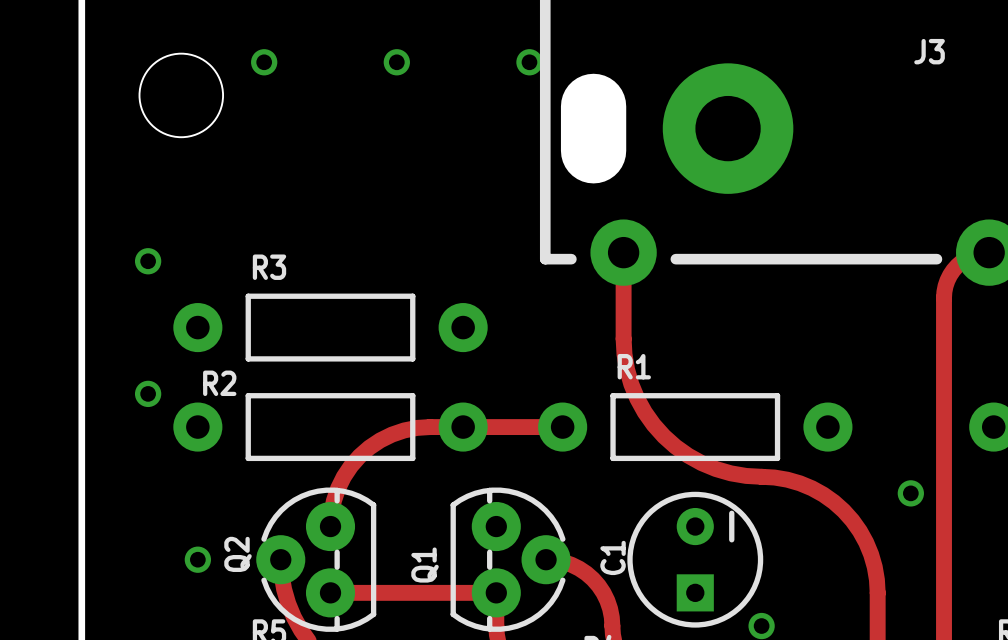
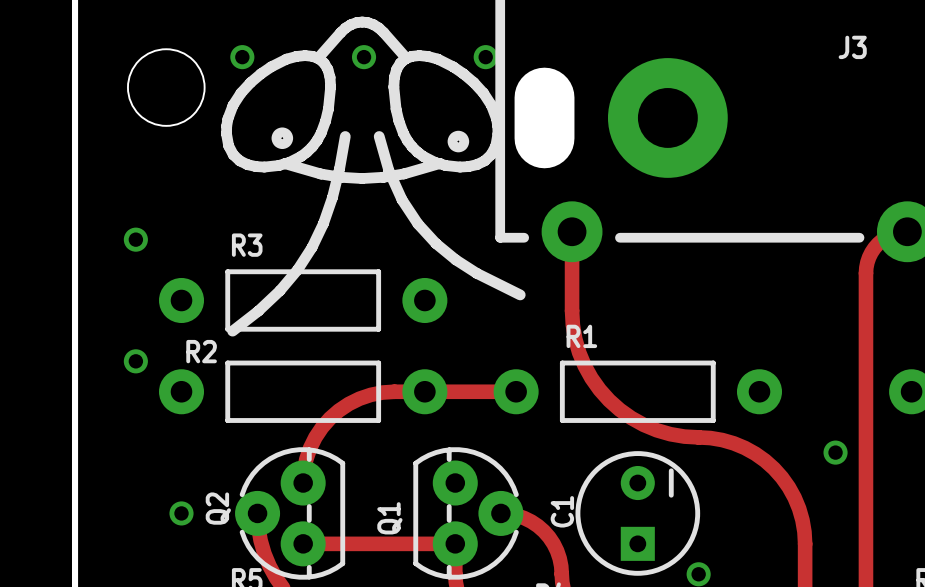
drawing: none -> [221, 16, 526, 337]

